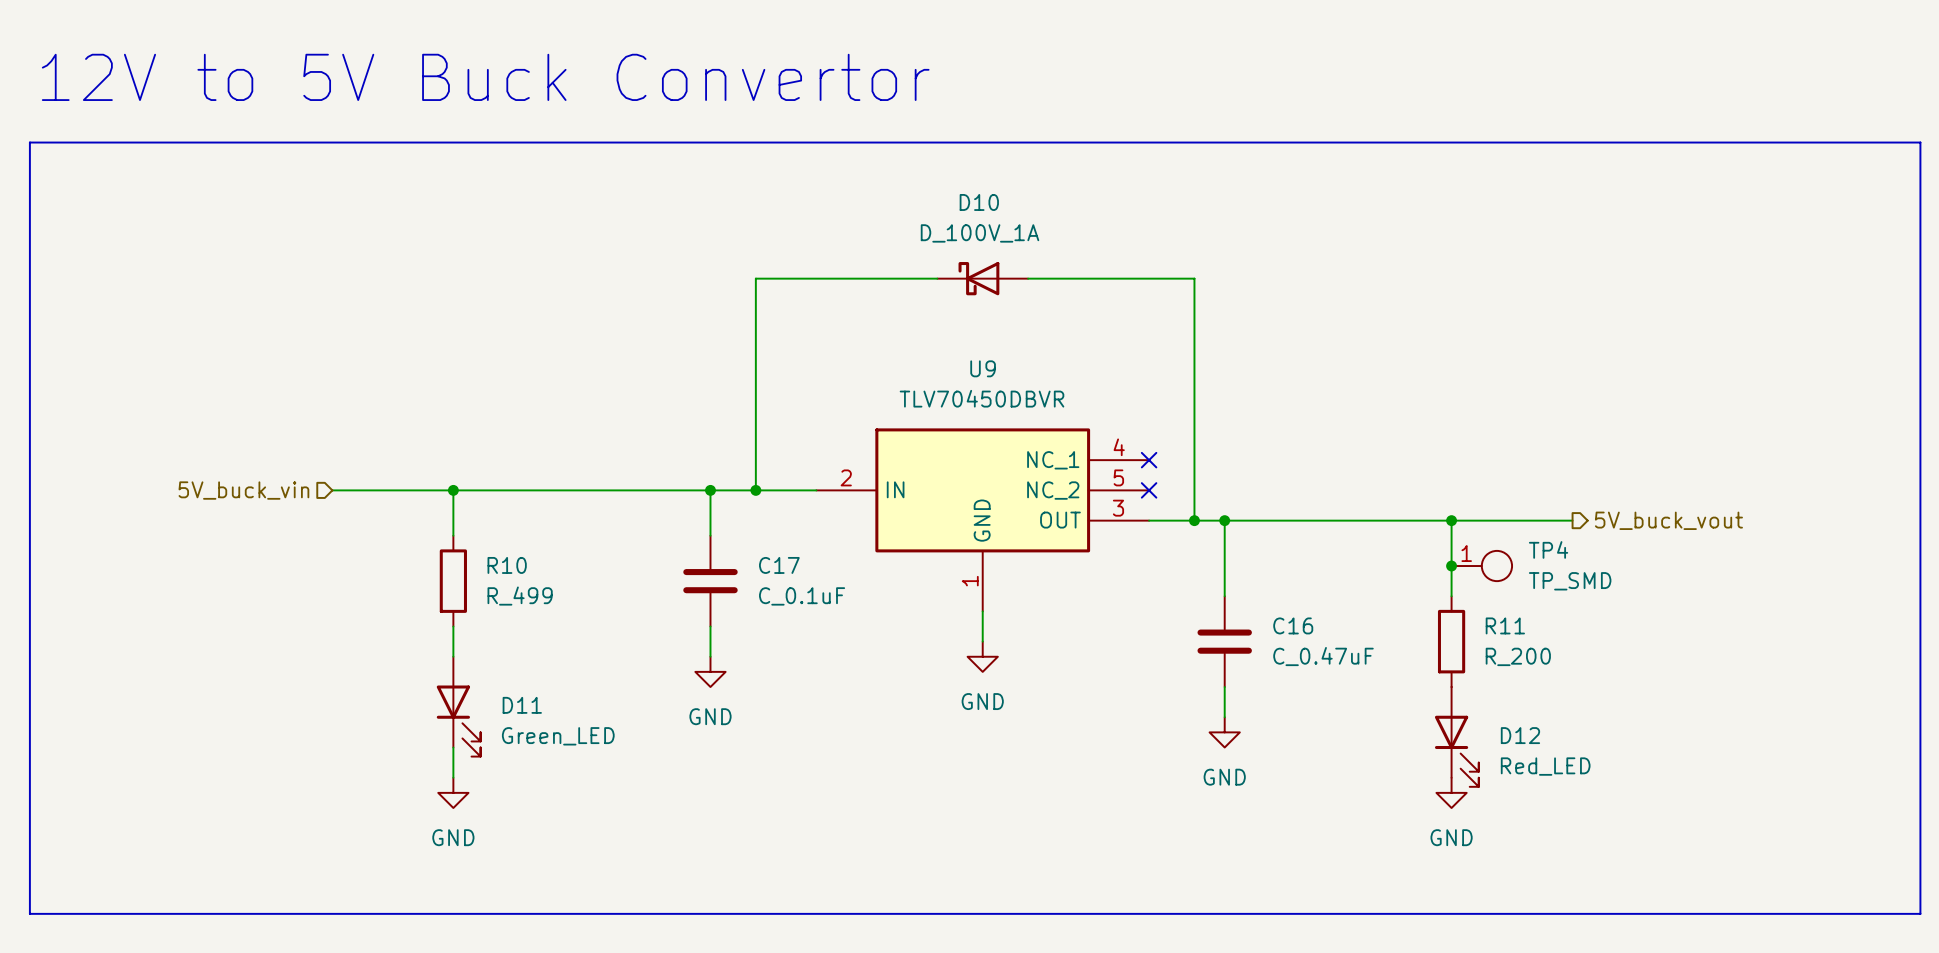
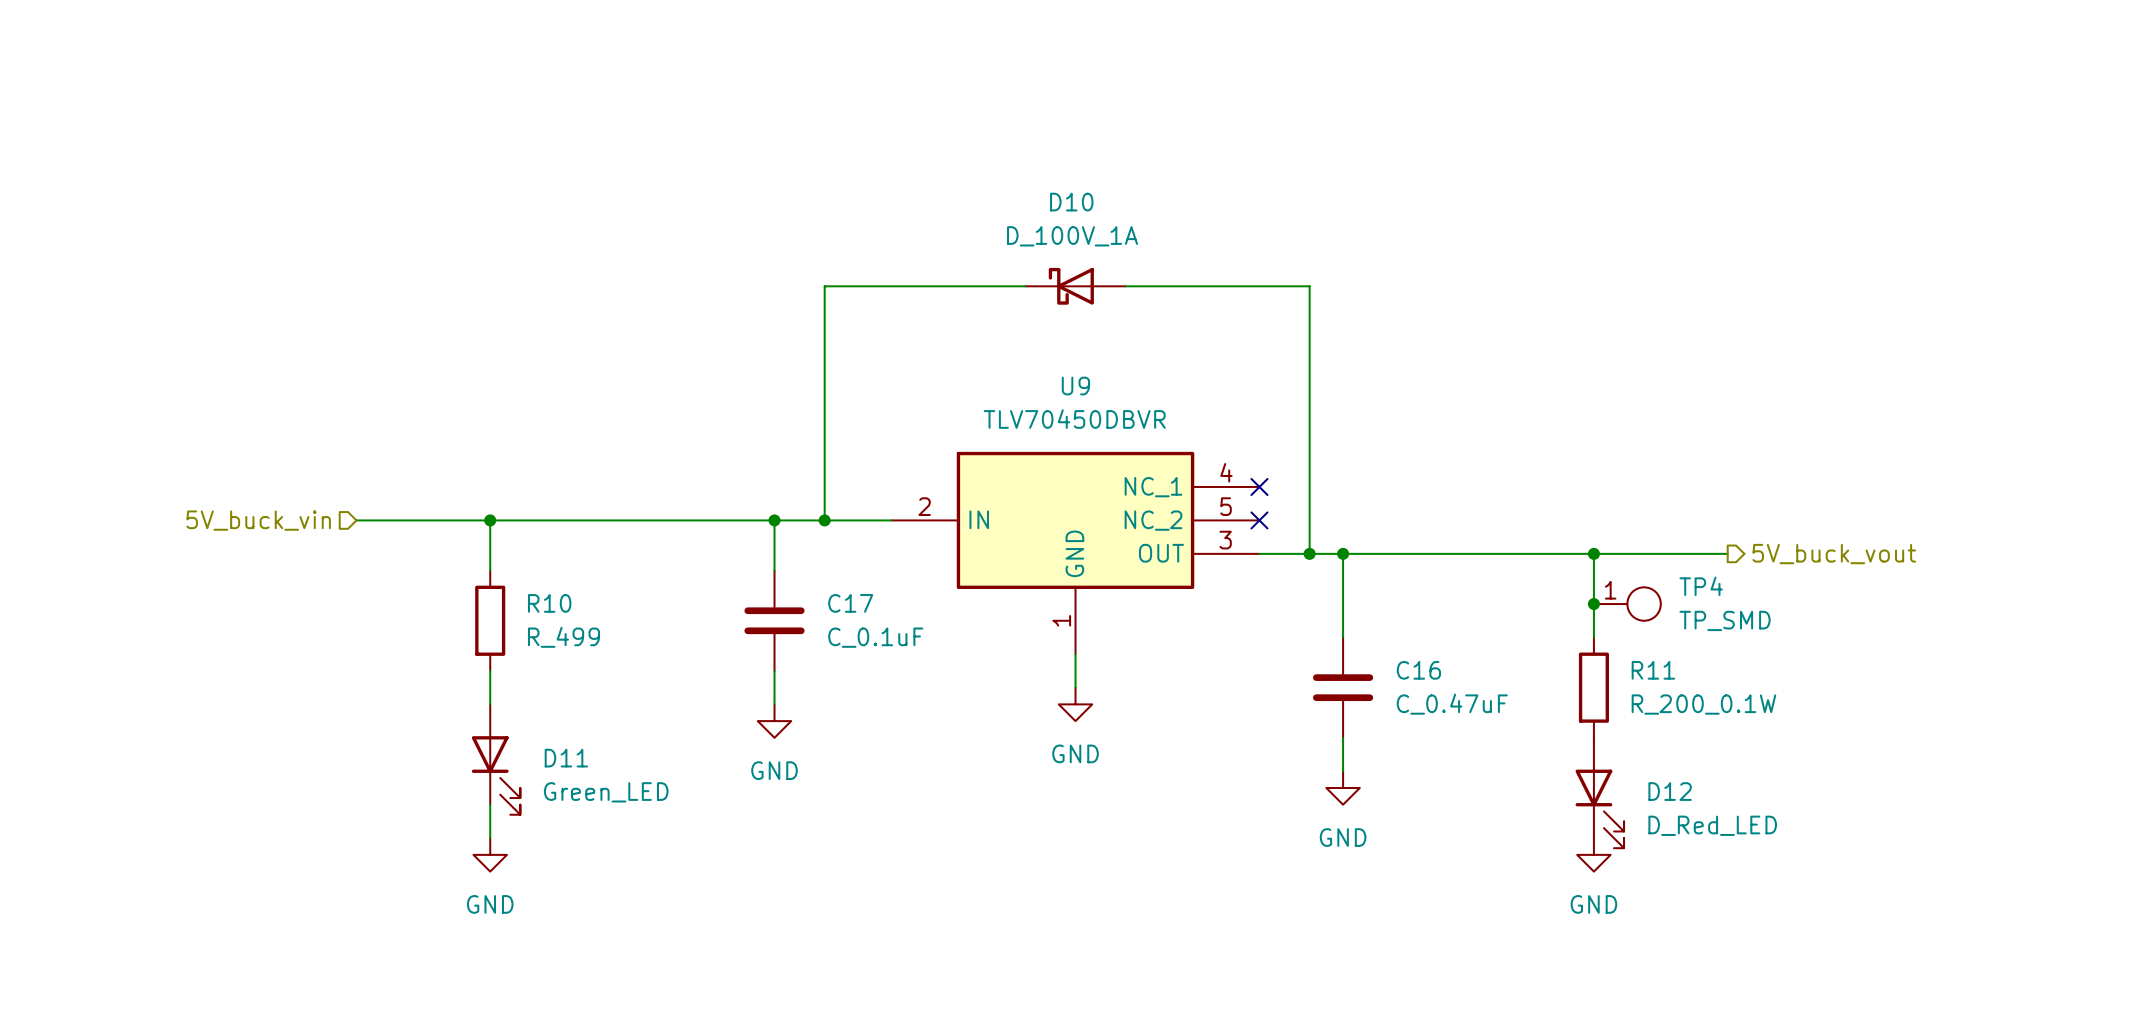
text: 12V to 5V Buck Convertor (485, 77) -> none
line: (29, 142) (1920, 142) (1920, 913) (29, 913) (29, 142) -> none
R11 value: R_200 (1518, 656) -> R_200_0.1W (1703, 704)
D12 value: Red_LED (1545, 766) -> D_Red_LED (1712, 825)

